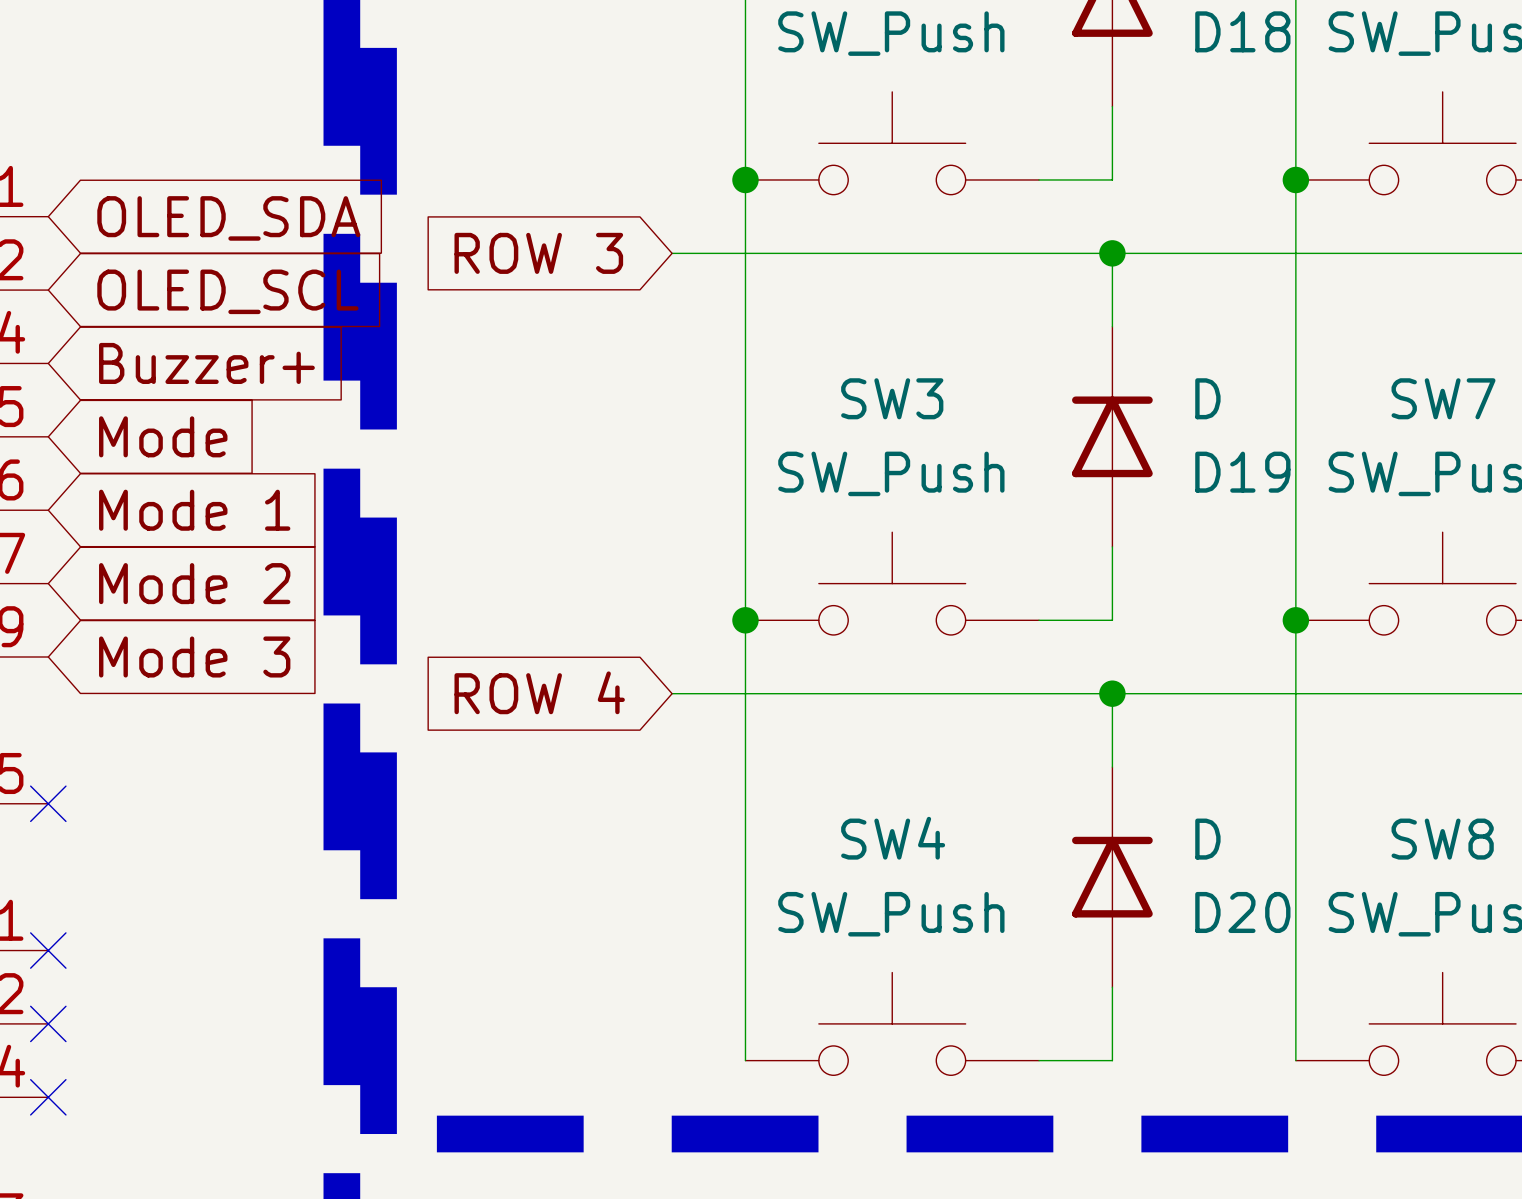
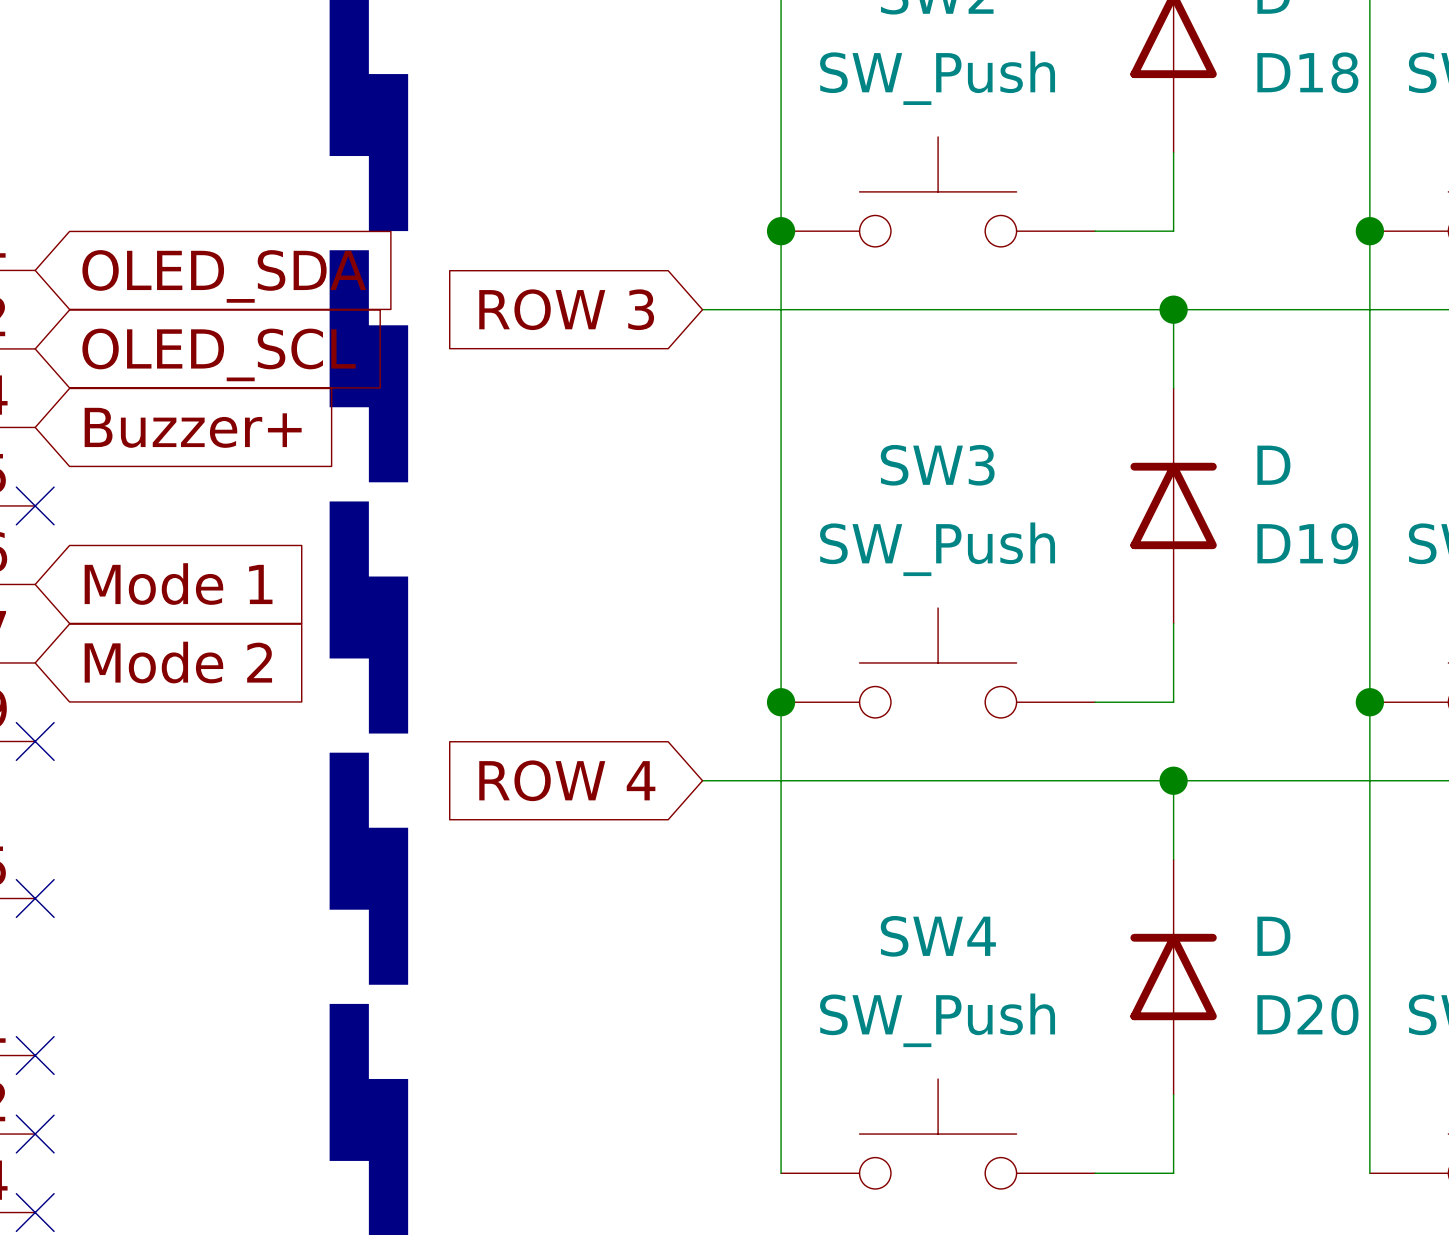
no-connect mark: none -> (35, 505)
global label: Mode (163, 436) -> none
no-connect mark: none -> (35, 741)
global label: Mode 3 (194, 656) -> none

